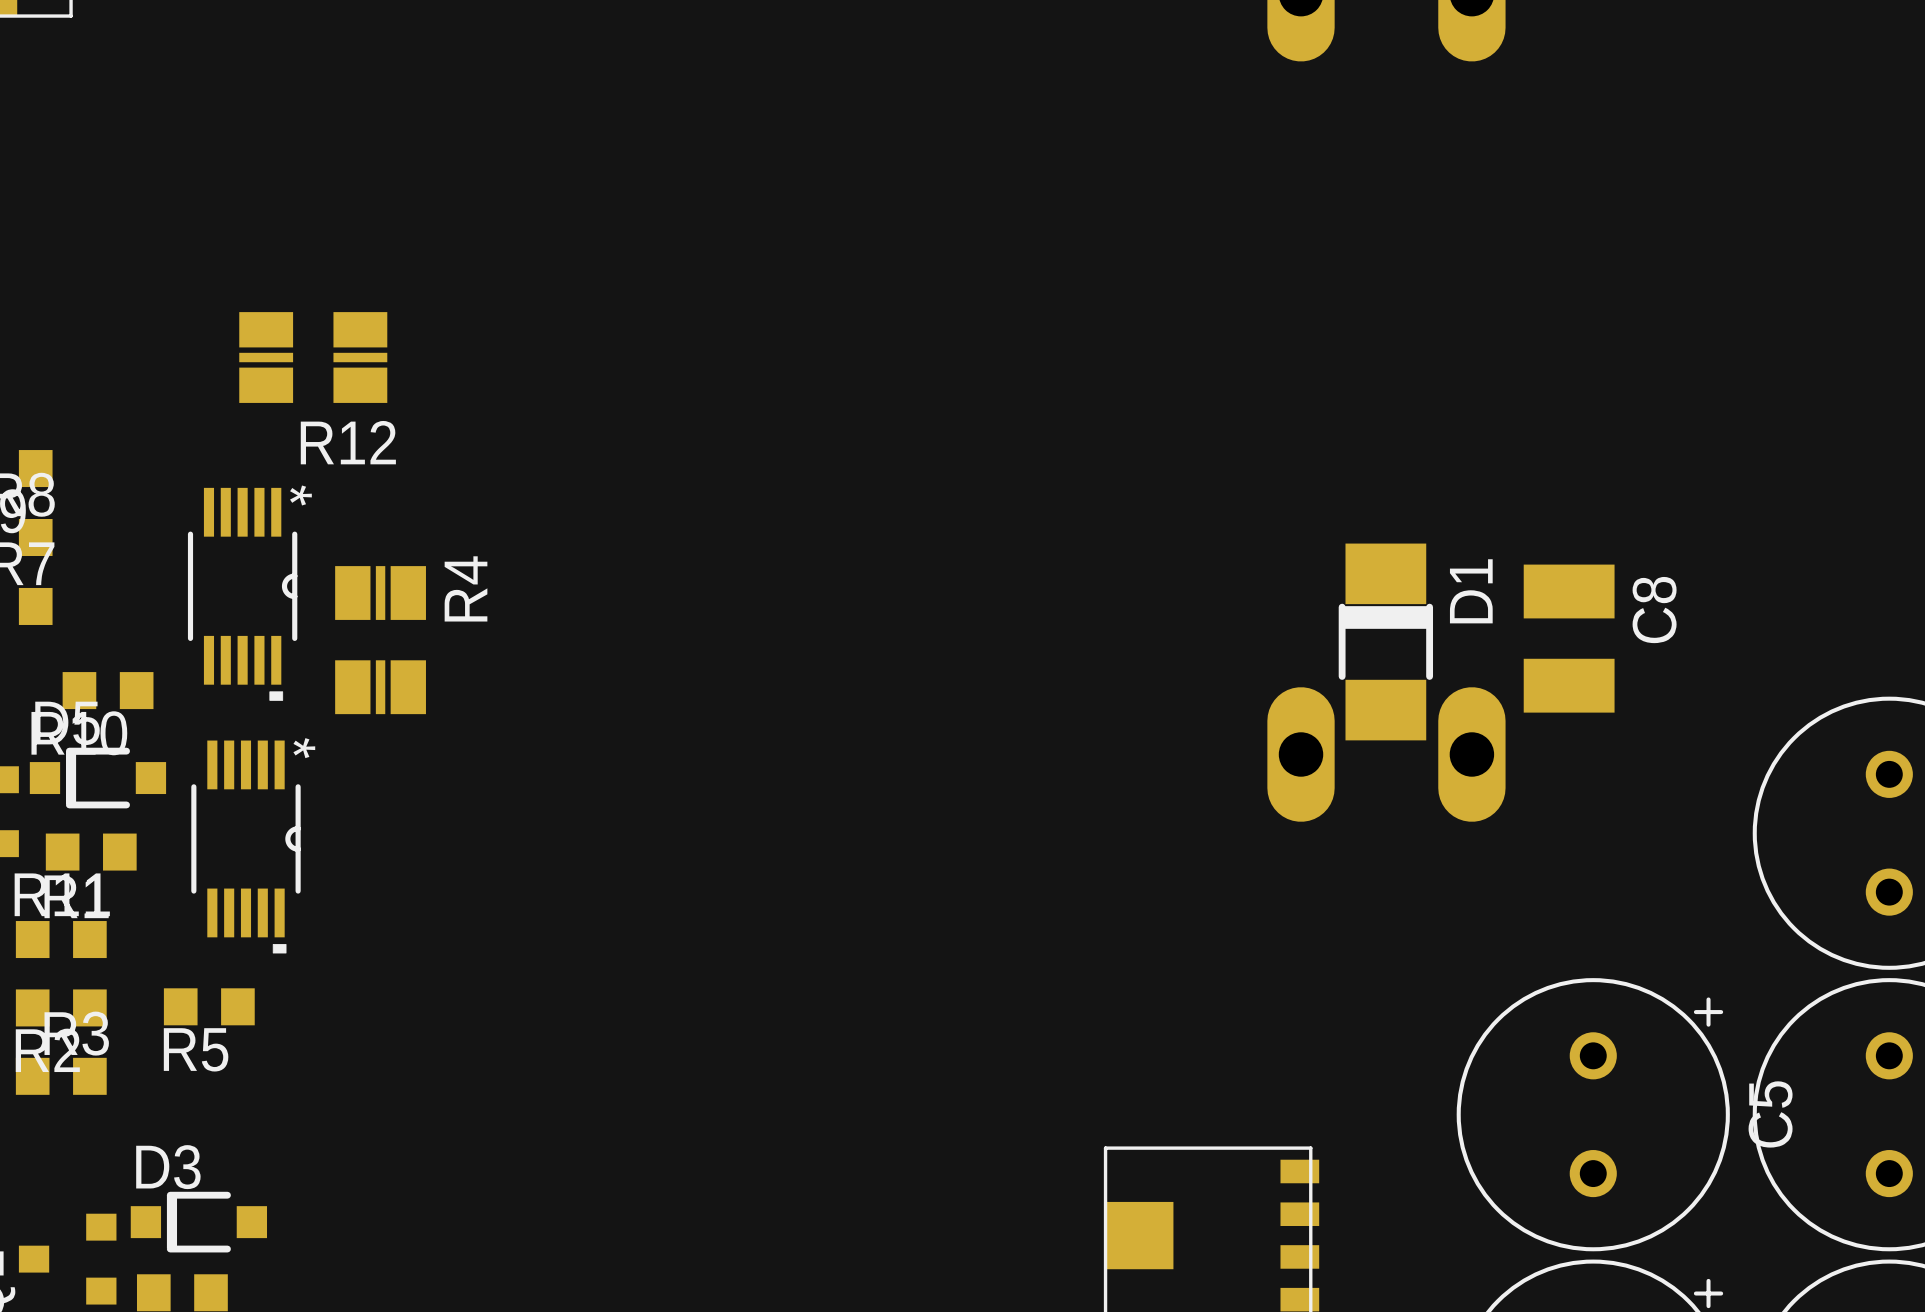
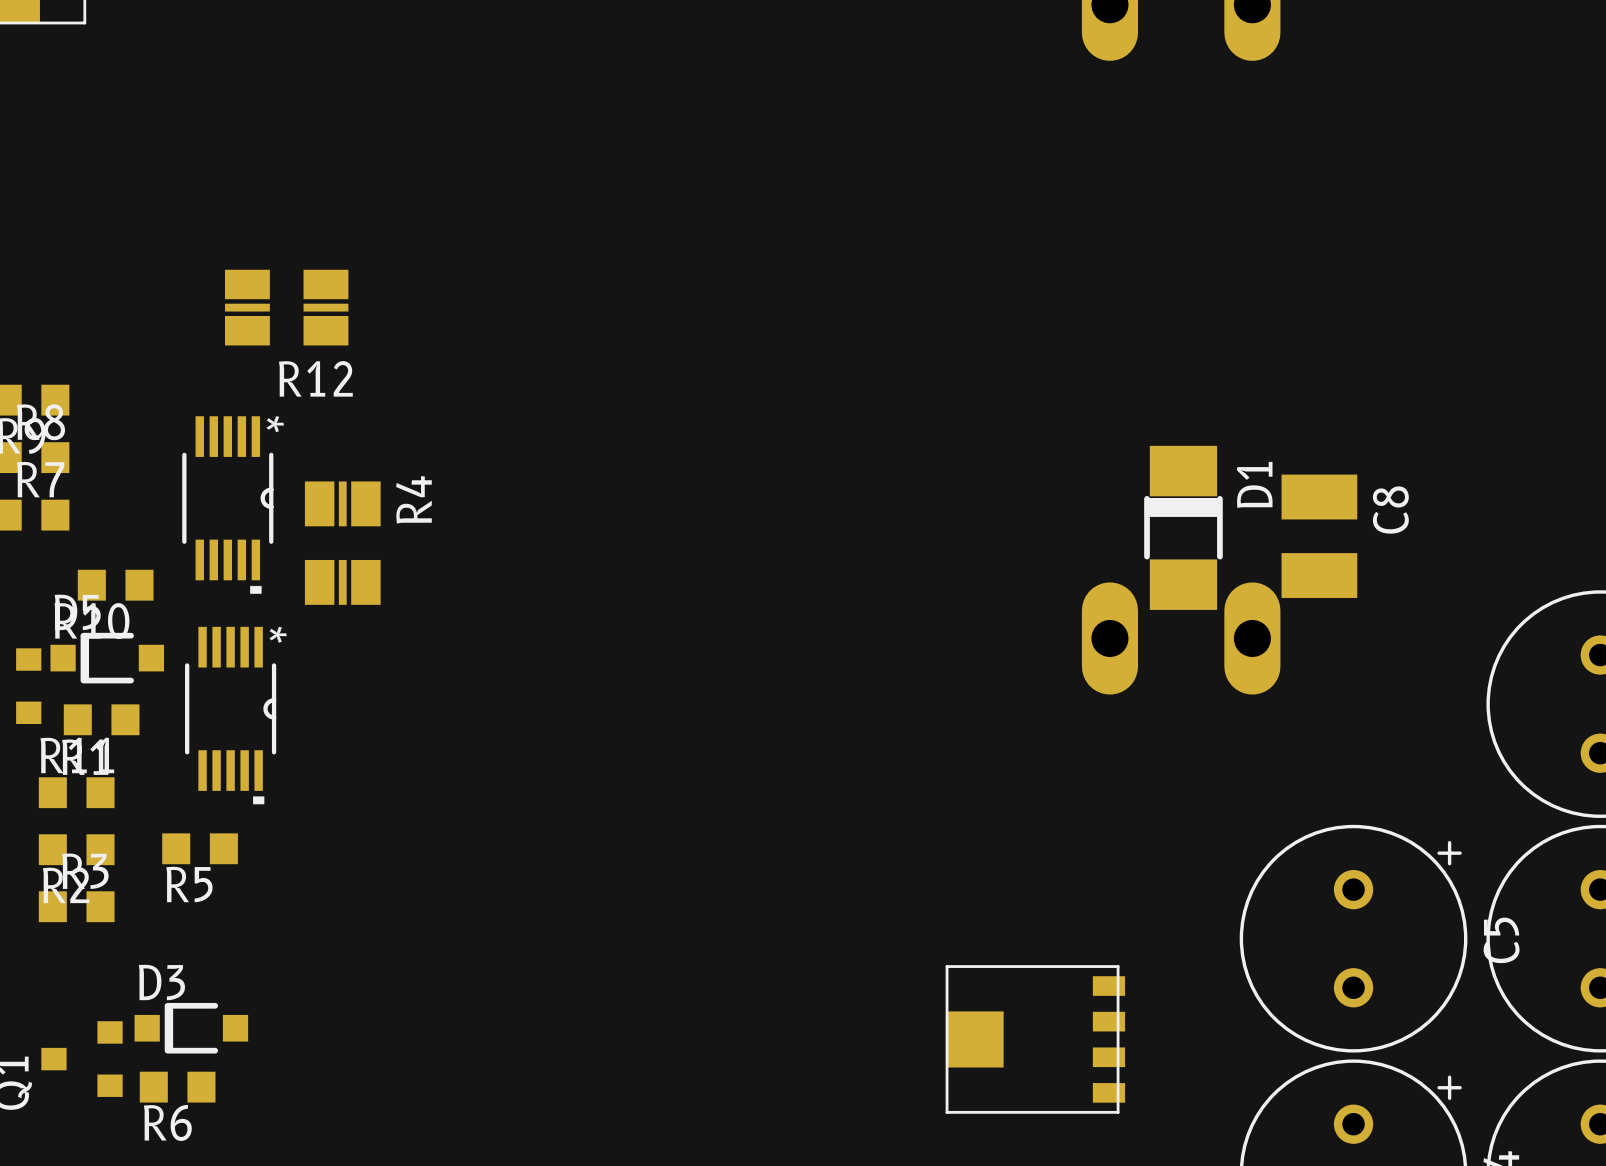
C8 position: (1569, 638) -> (1319, 536)
D1 position: (1385, 641) -> (1183, 527)

